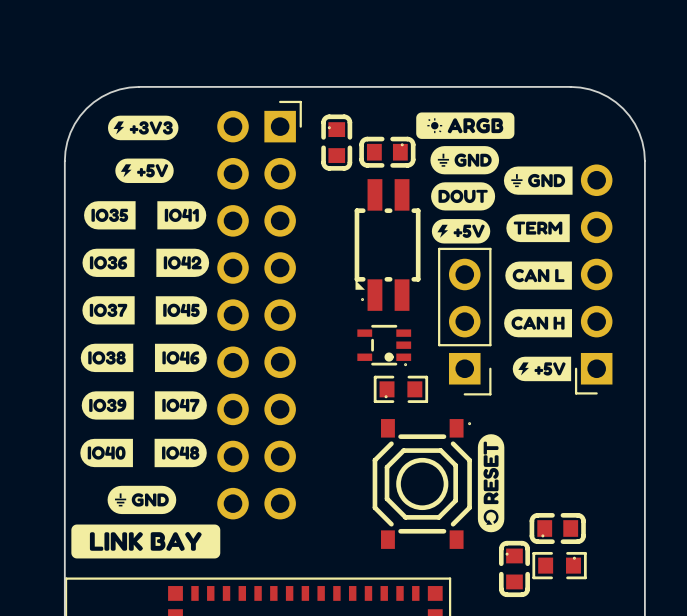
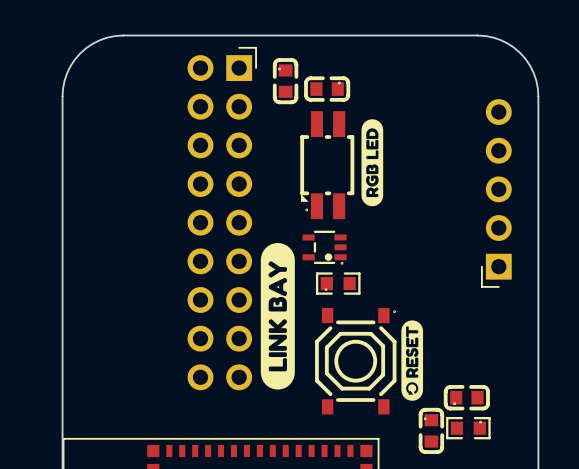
drawing: [416, 112, 573, 382] -> none
drawing: [71, 115, 221, 559] -> none
drawing: none -> [361, 119, 384, 207]
part: (464, 321) -> none
drawing: none -> [260, 243, 295, 390]

